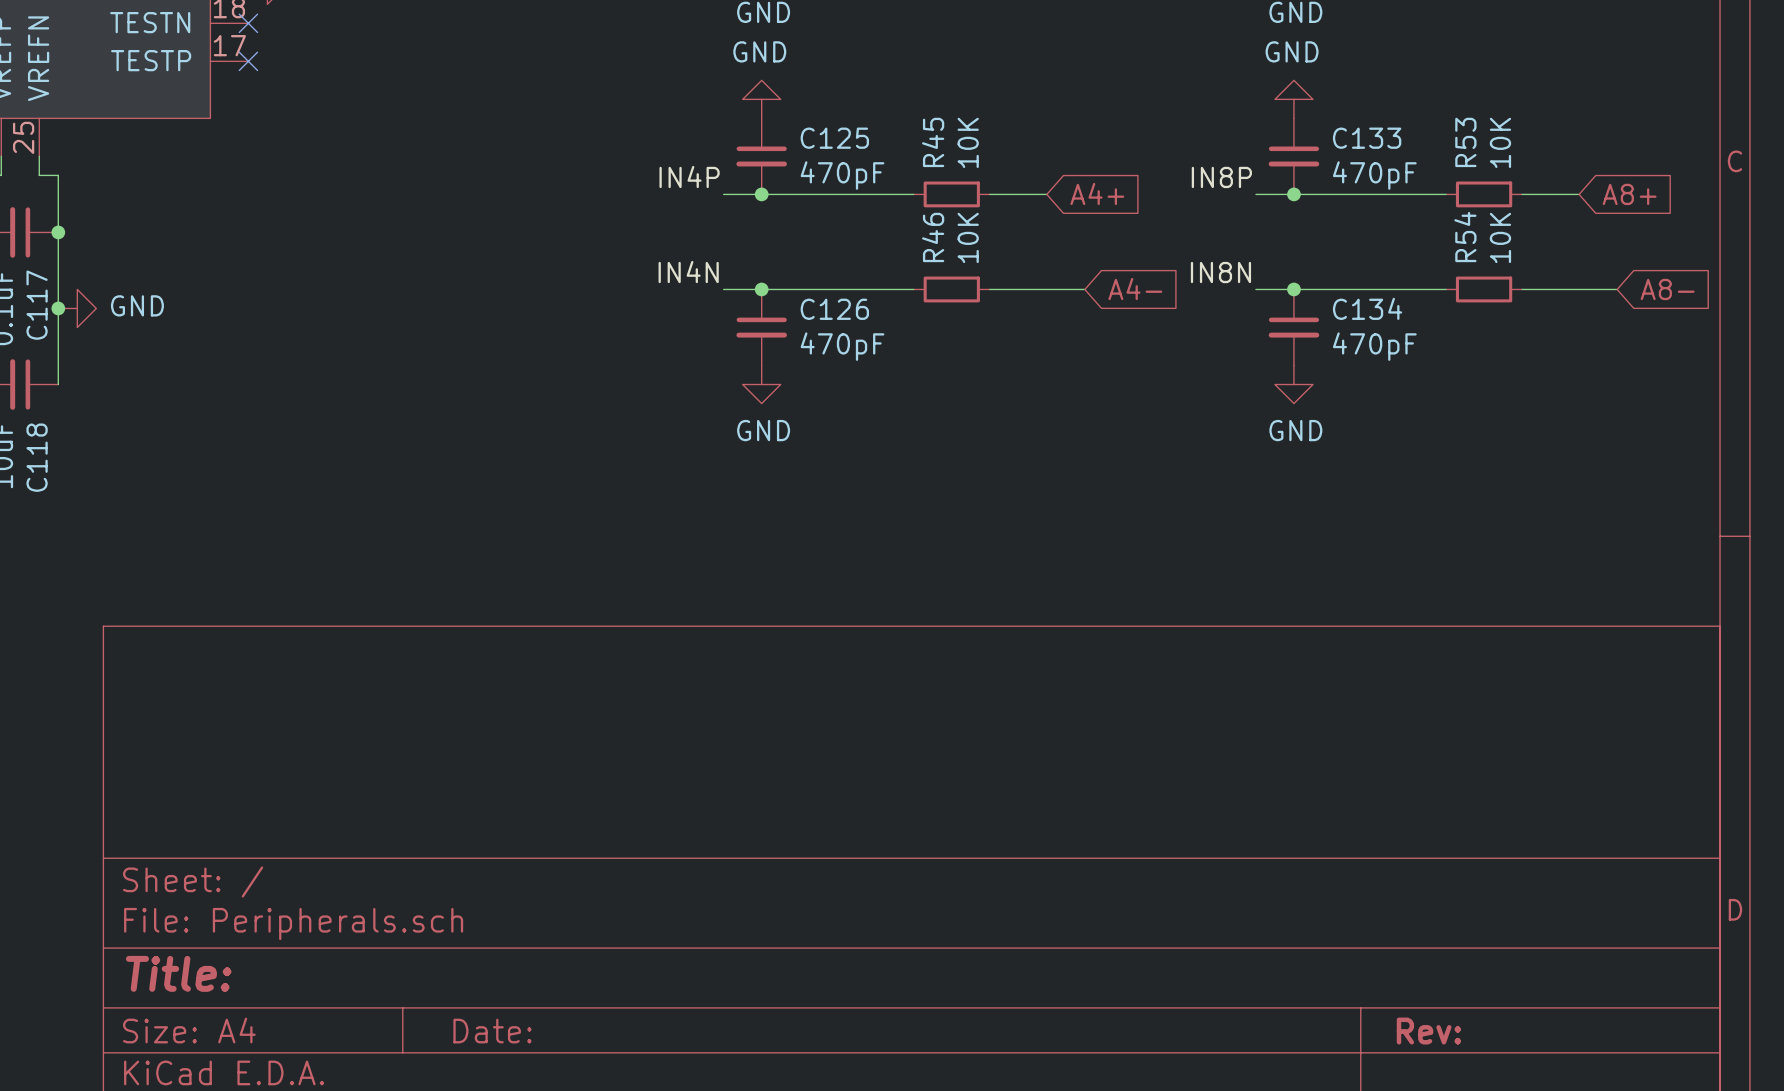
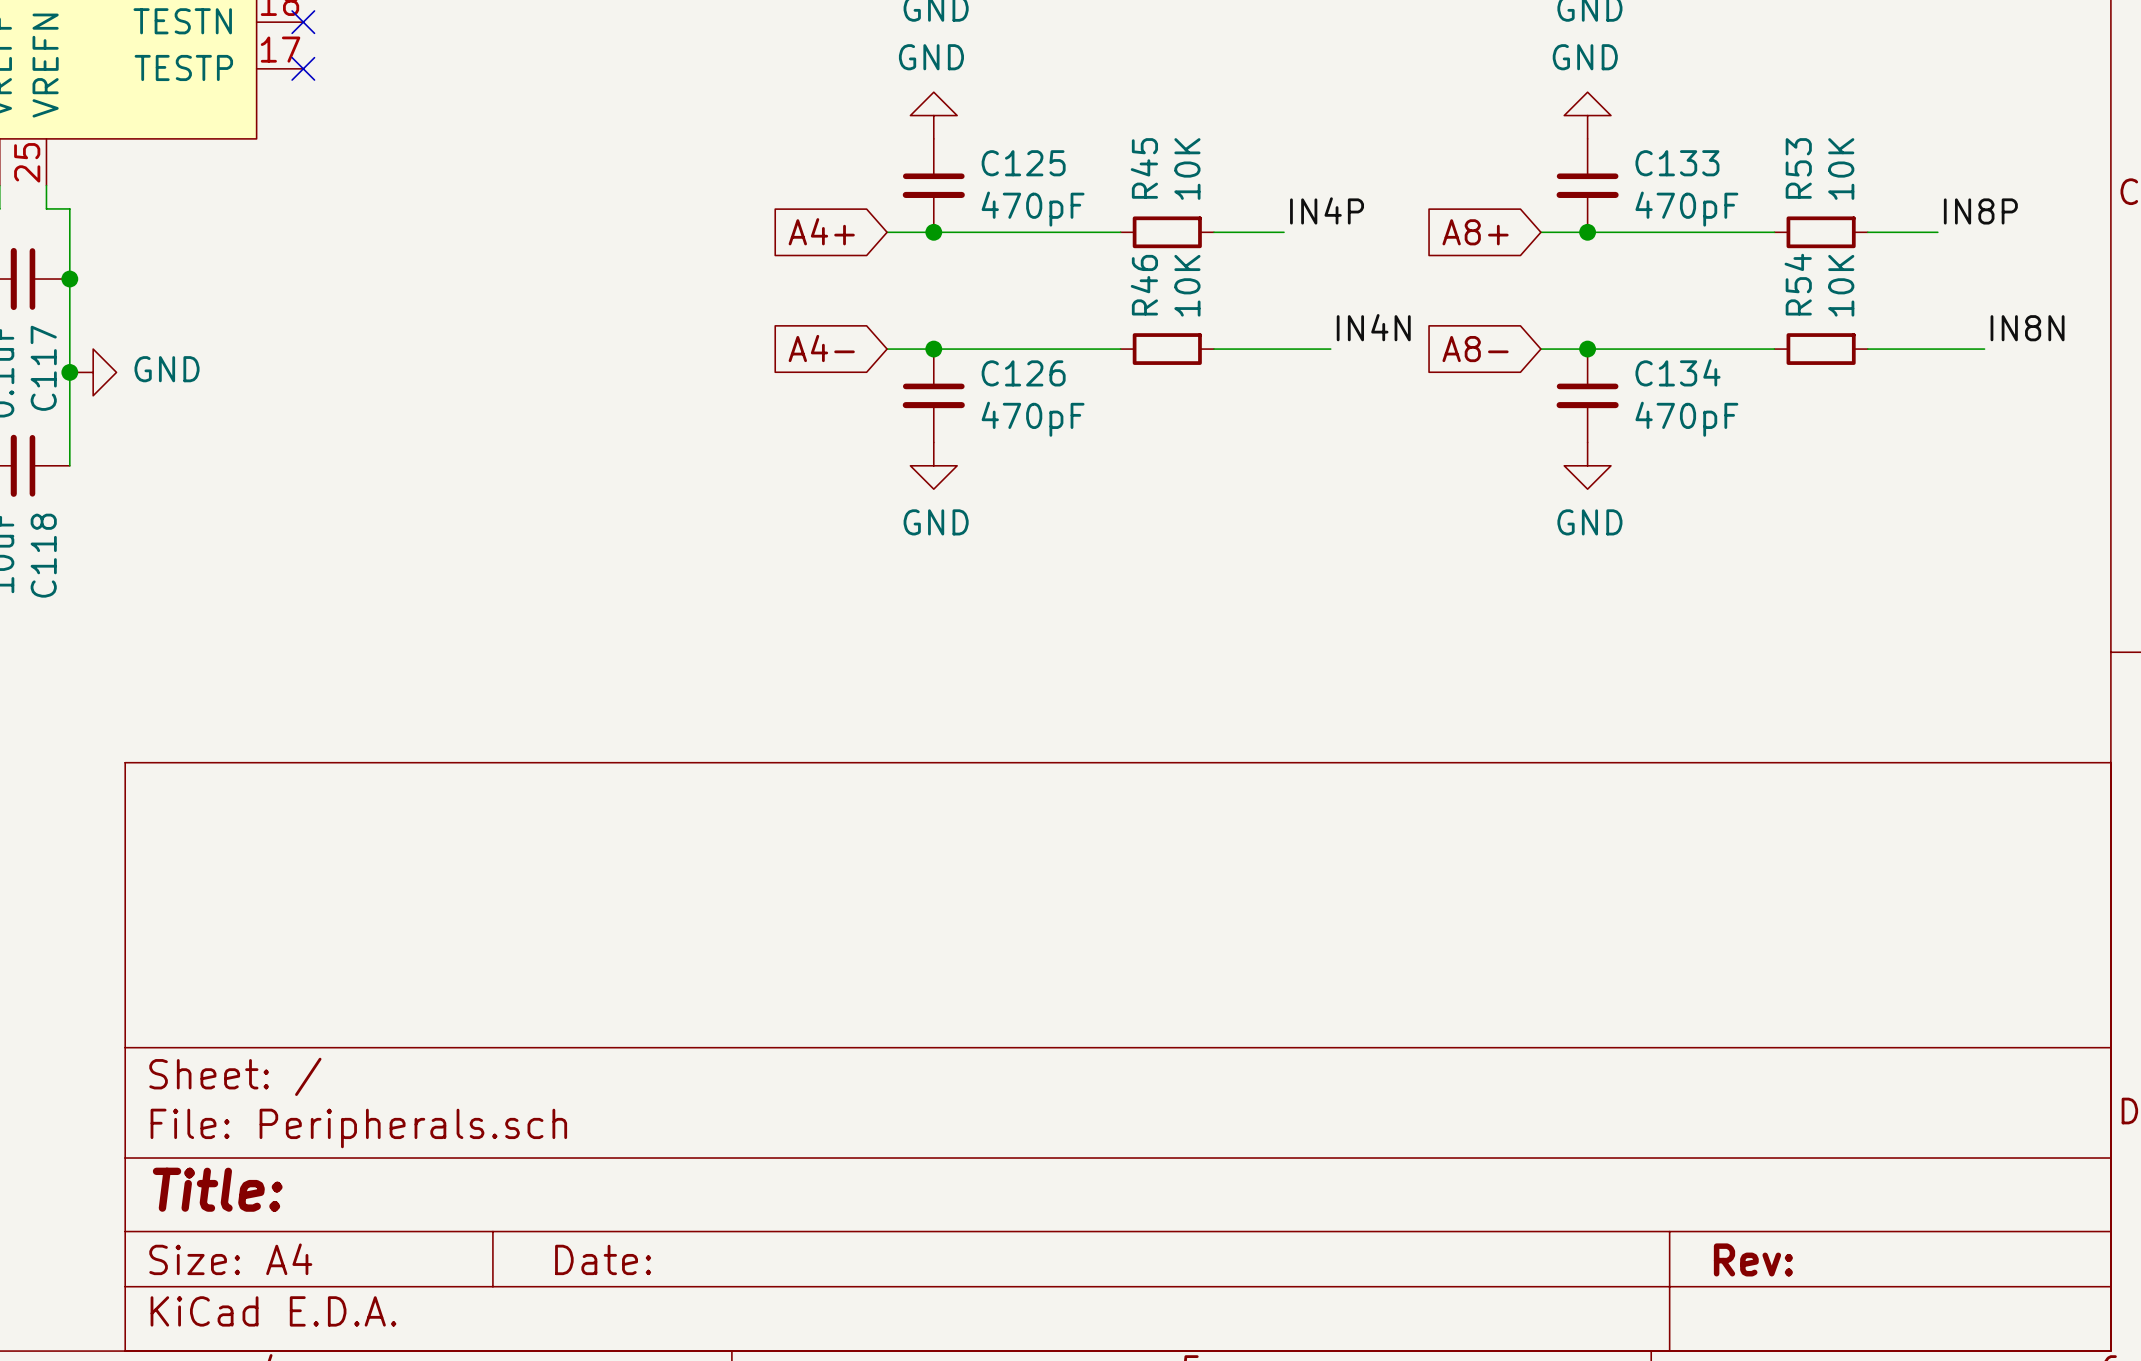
label position: IN4P (689, 177) -> IN4P (1327, 210)
label position: IN8P (1221, 177) -> IN8P (1980, 211)
global label rotation: 0° (1097, 193) -> 180° (821, 231)
global label position: A4+ (1097, 193) -> A4+ (821, 231)
global label rotation: 0° (1629, 194) -> 180° (1475, 232)
global label position: A8+ (1629, 194) -> A8+ (1475, 232)
label position: IN4N (688, 272) -> IN4N (1373, 327)
label position: IN8N (1220, 272) -> IN8N (2027, 328)
global label rotation: 0° (1135, 289) -> 180° (821, 348)
global label position: A4- (1135, 289) -> A4- (821, 348)
global label rotation: 0° (1667, 289) -> 180° (1475, 349)
global label position: A8- (1667, 289) -> A8- (1475, 349)

